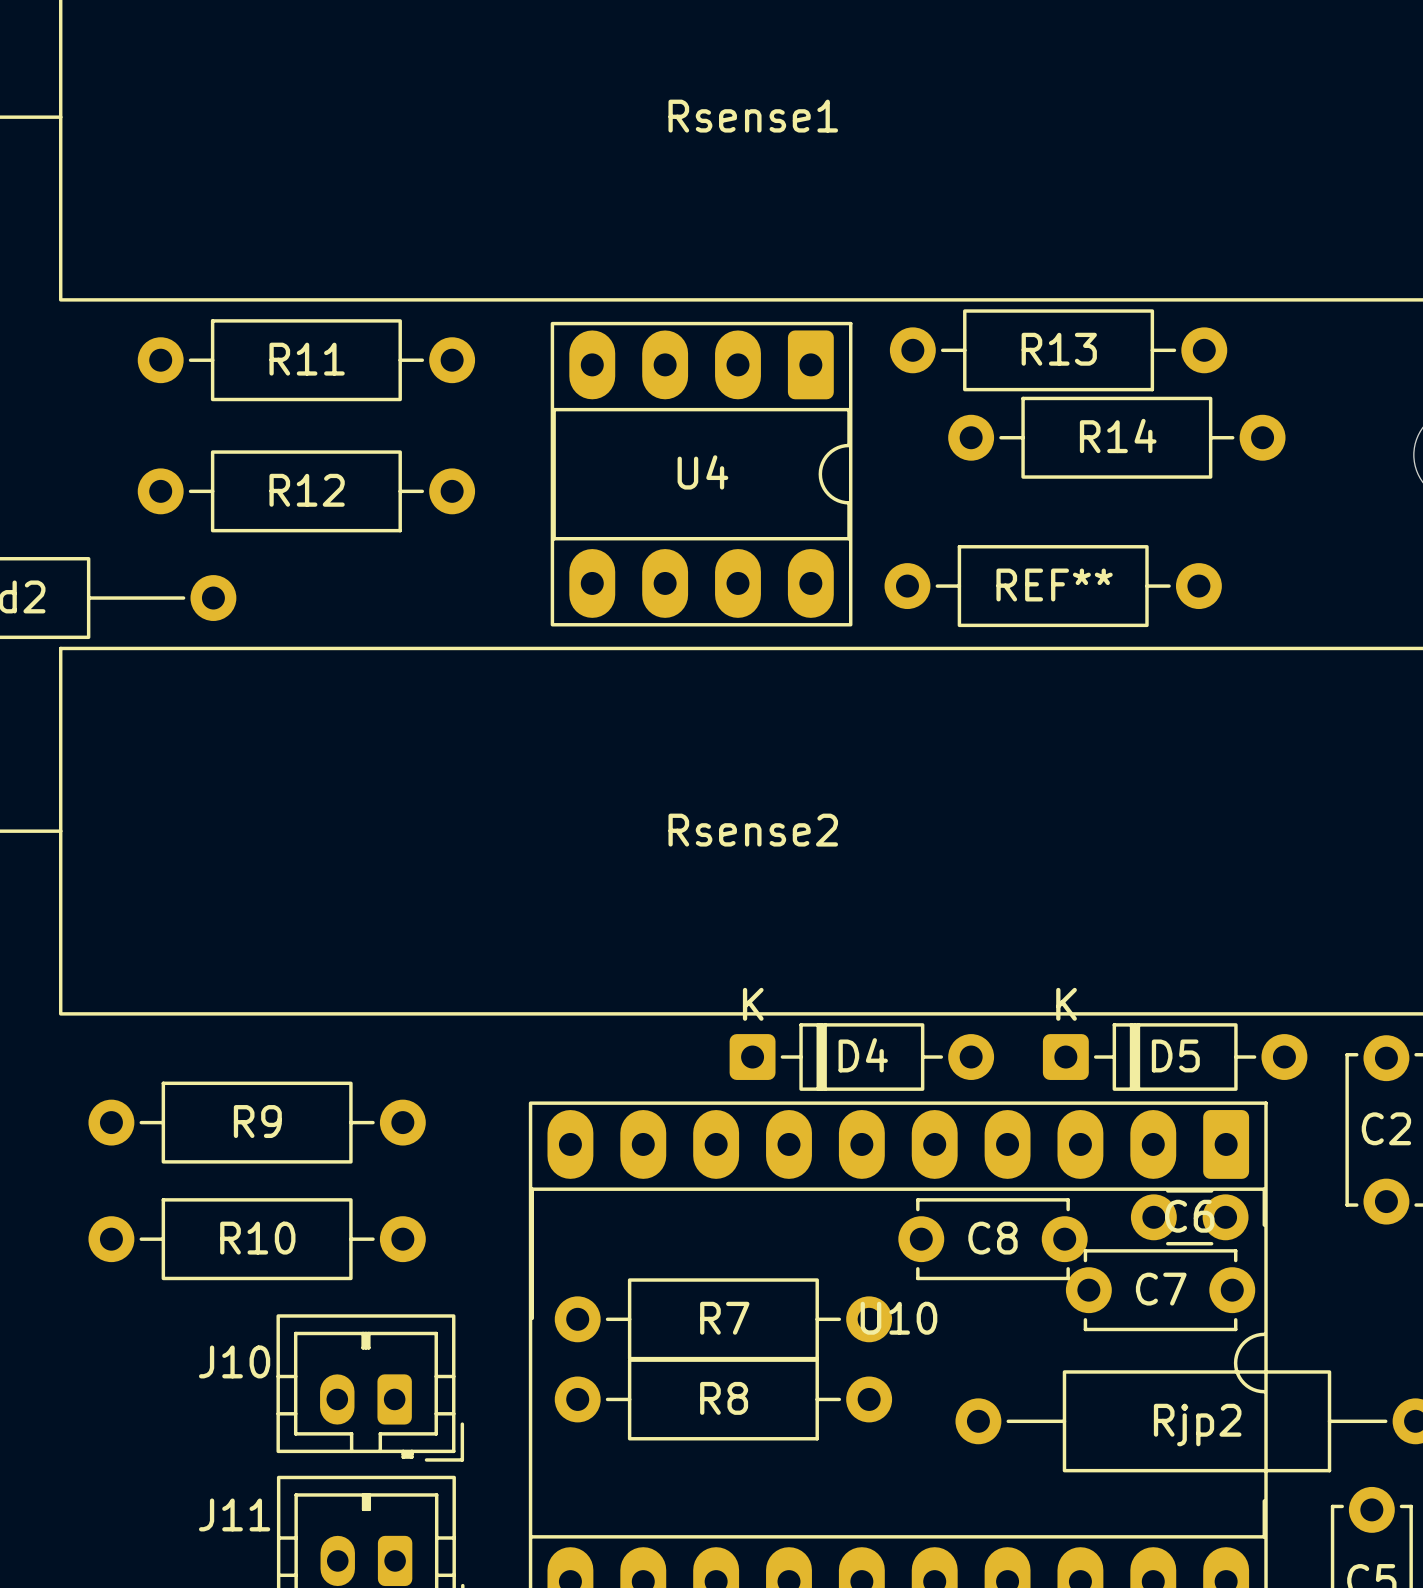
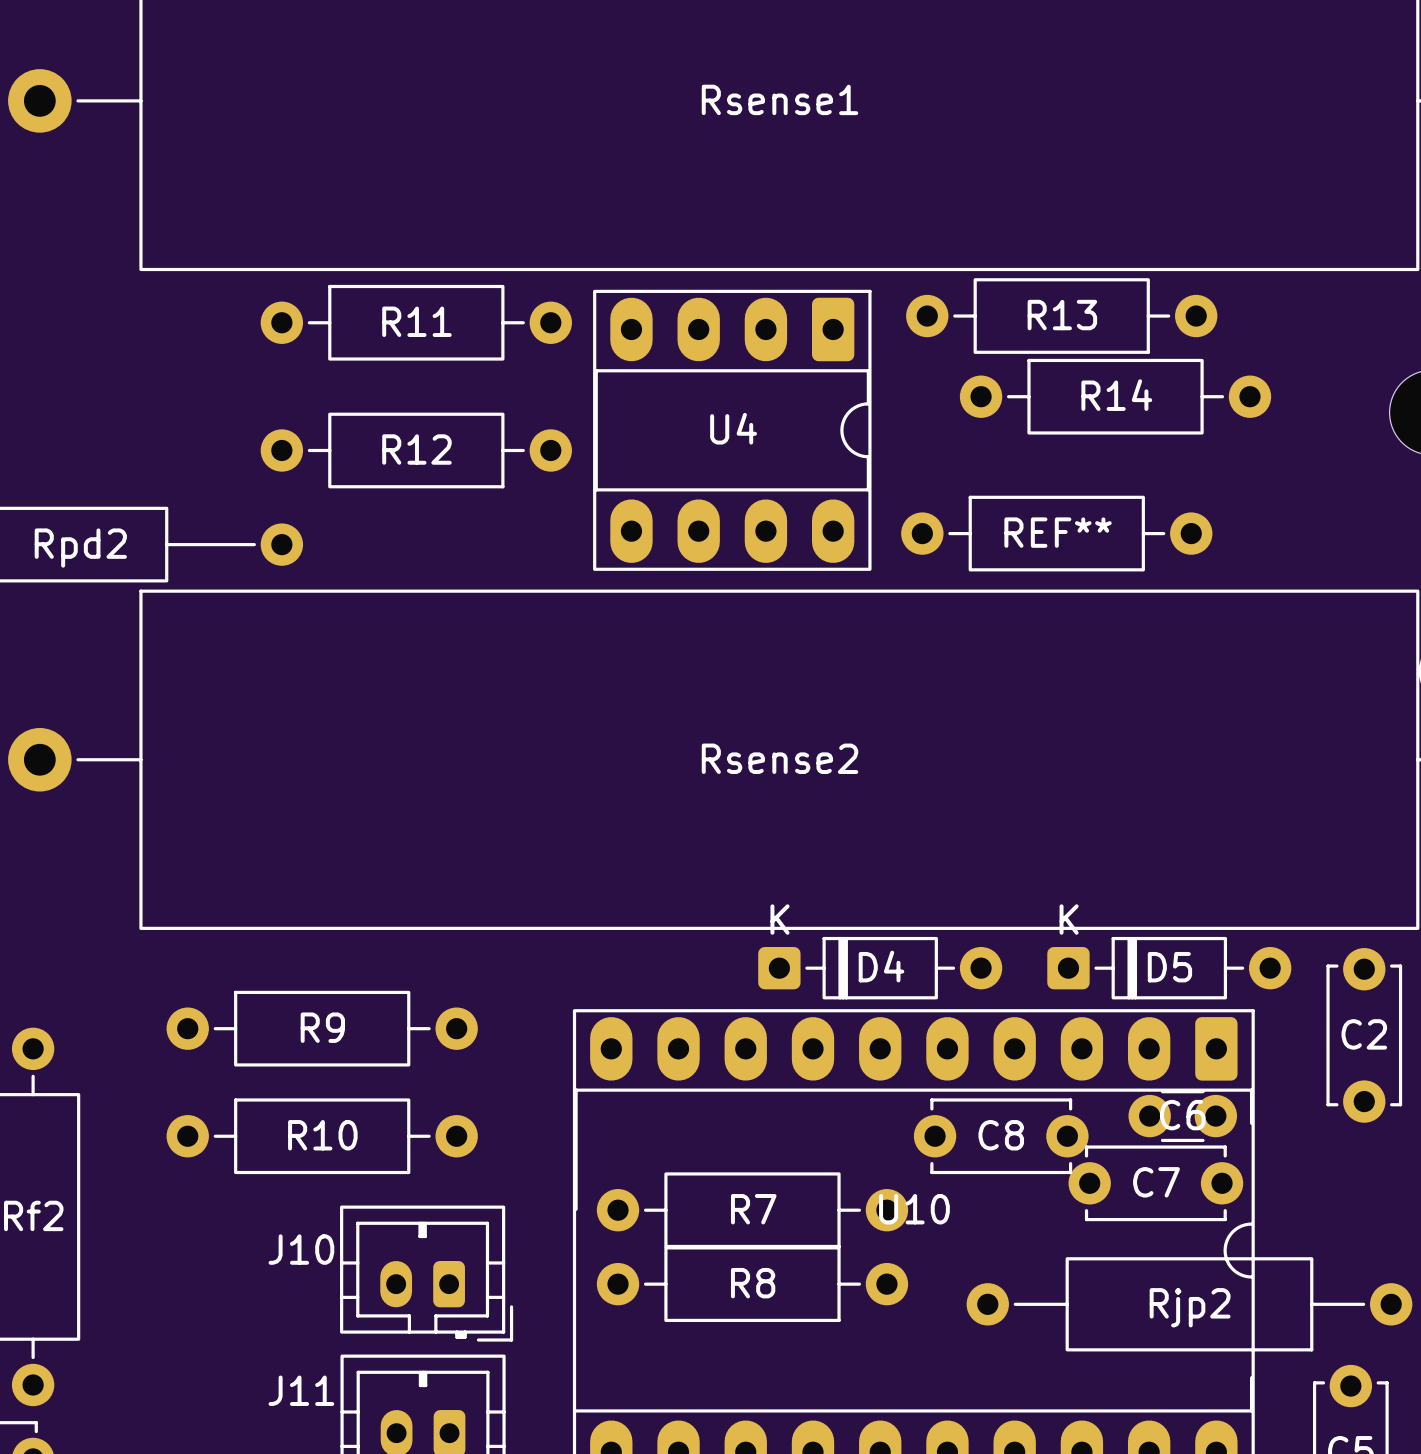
R11 position: (306, 360) -> (416, 322)
R12 position: (306, 491) -> (416, 450)

